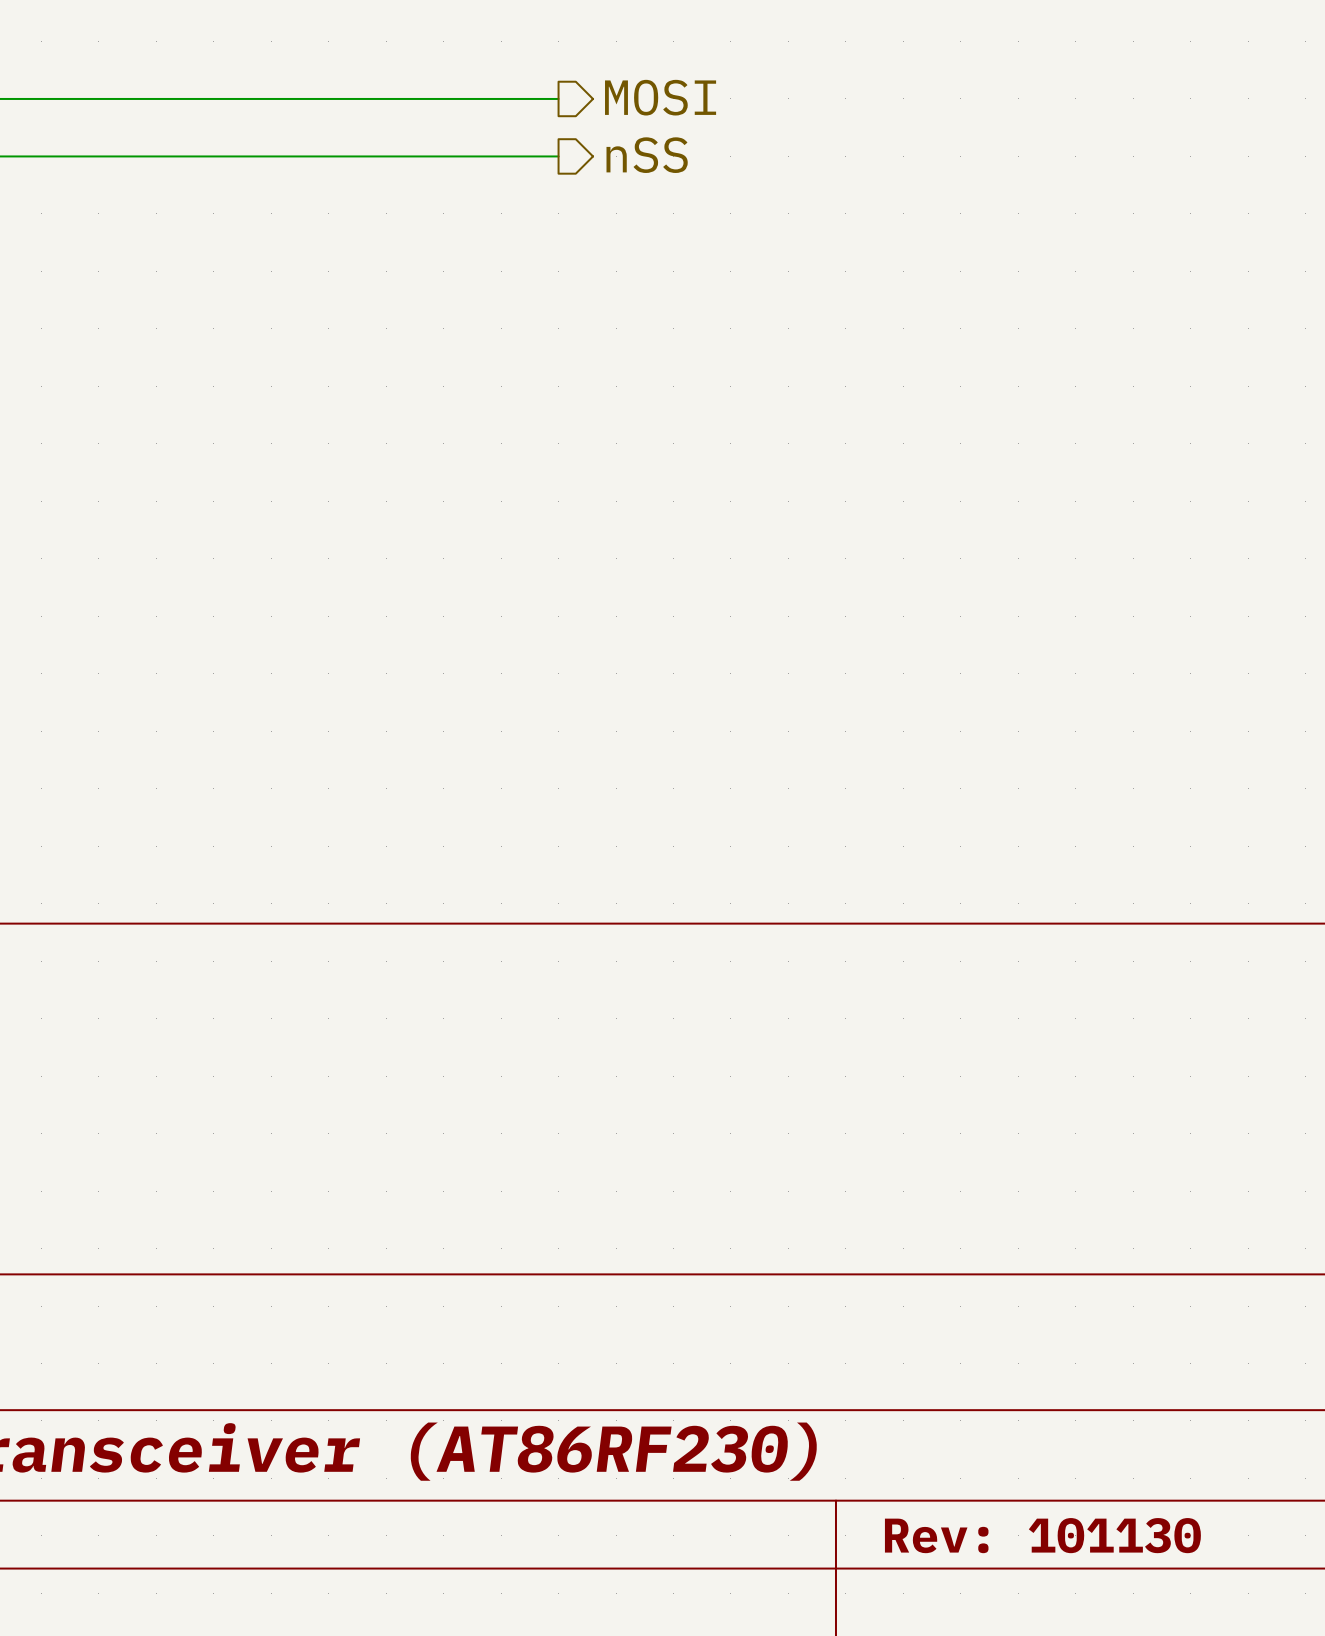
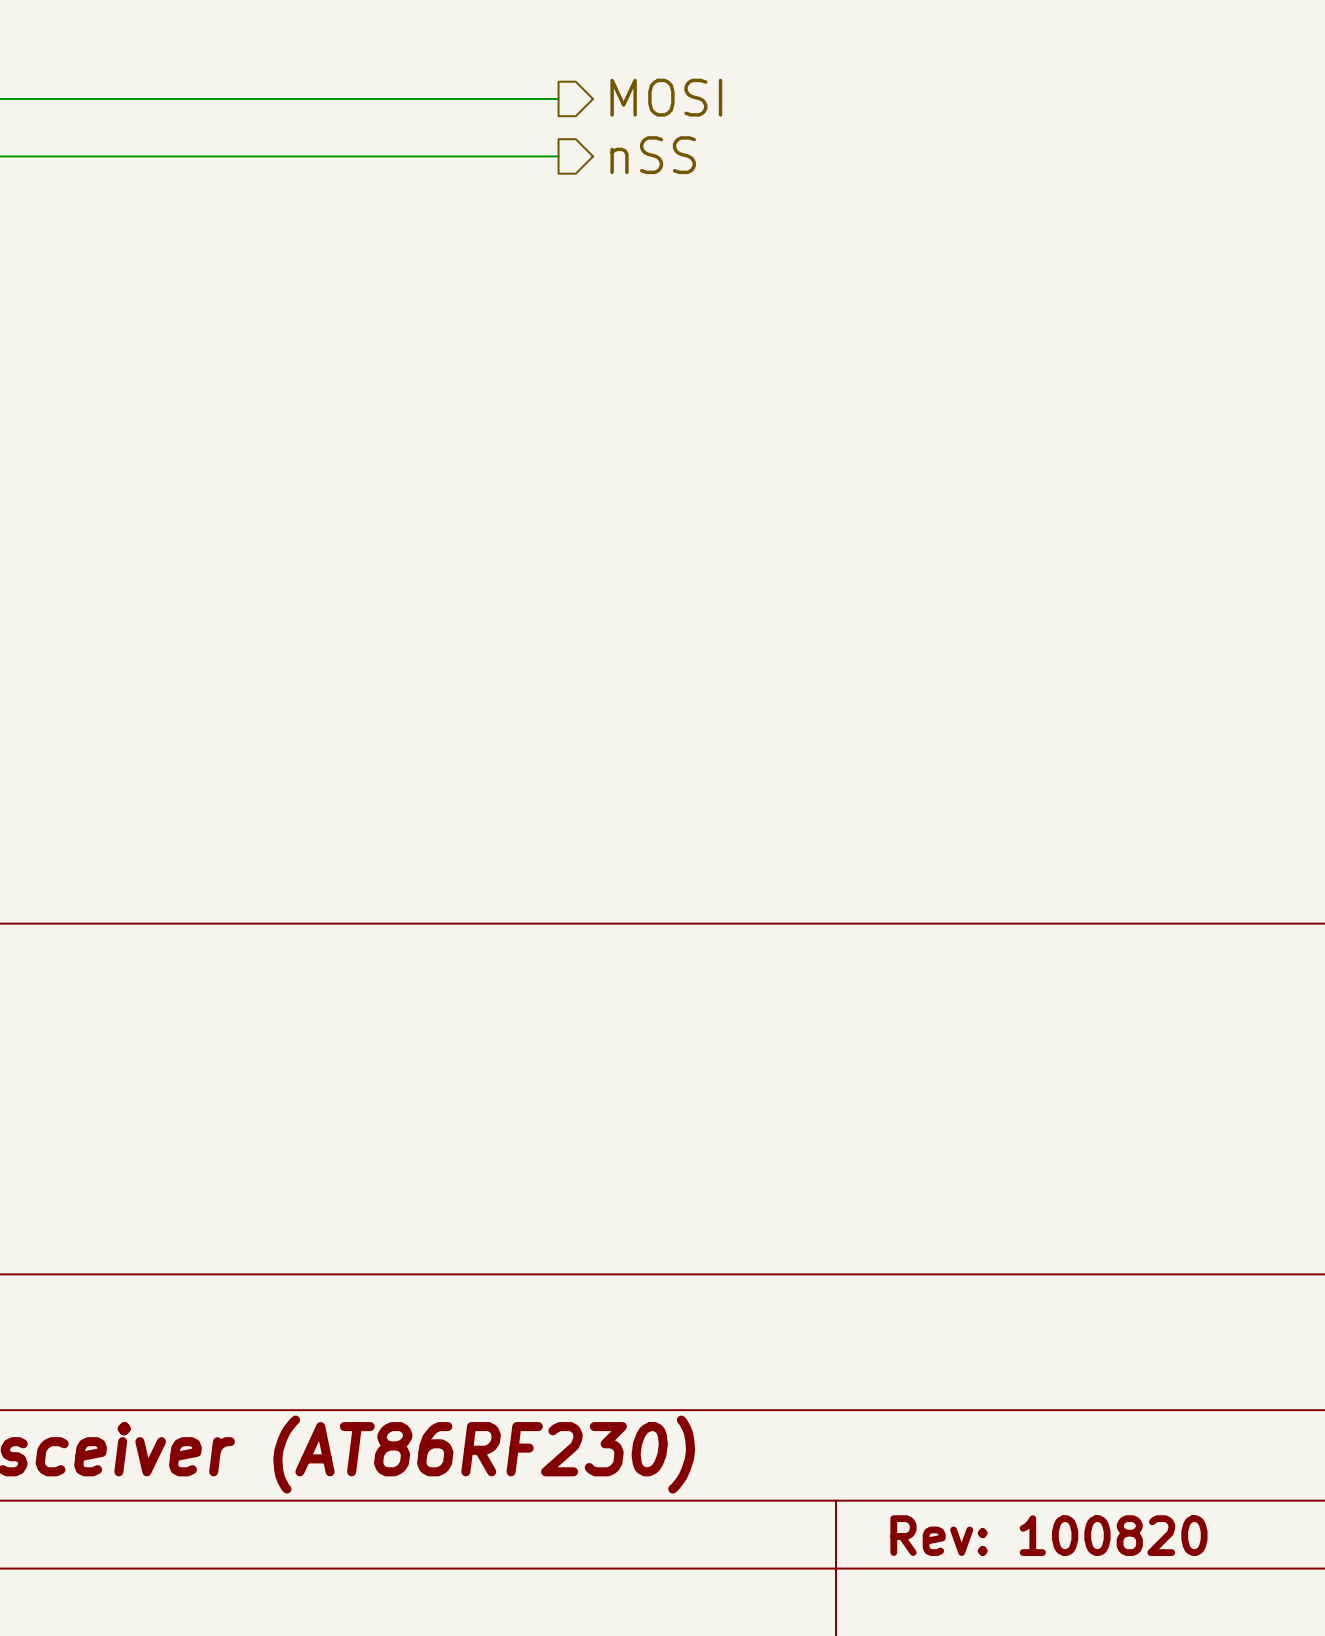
title block: Rev: 101130 (1042, 1535) -> Rev: 100820 (1048, 1535)

